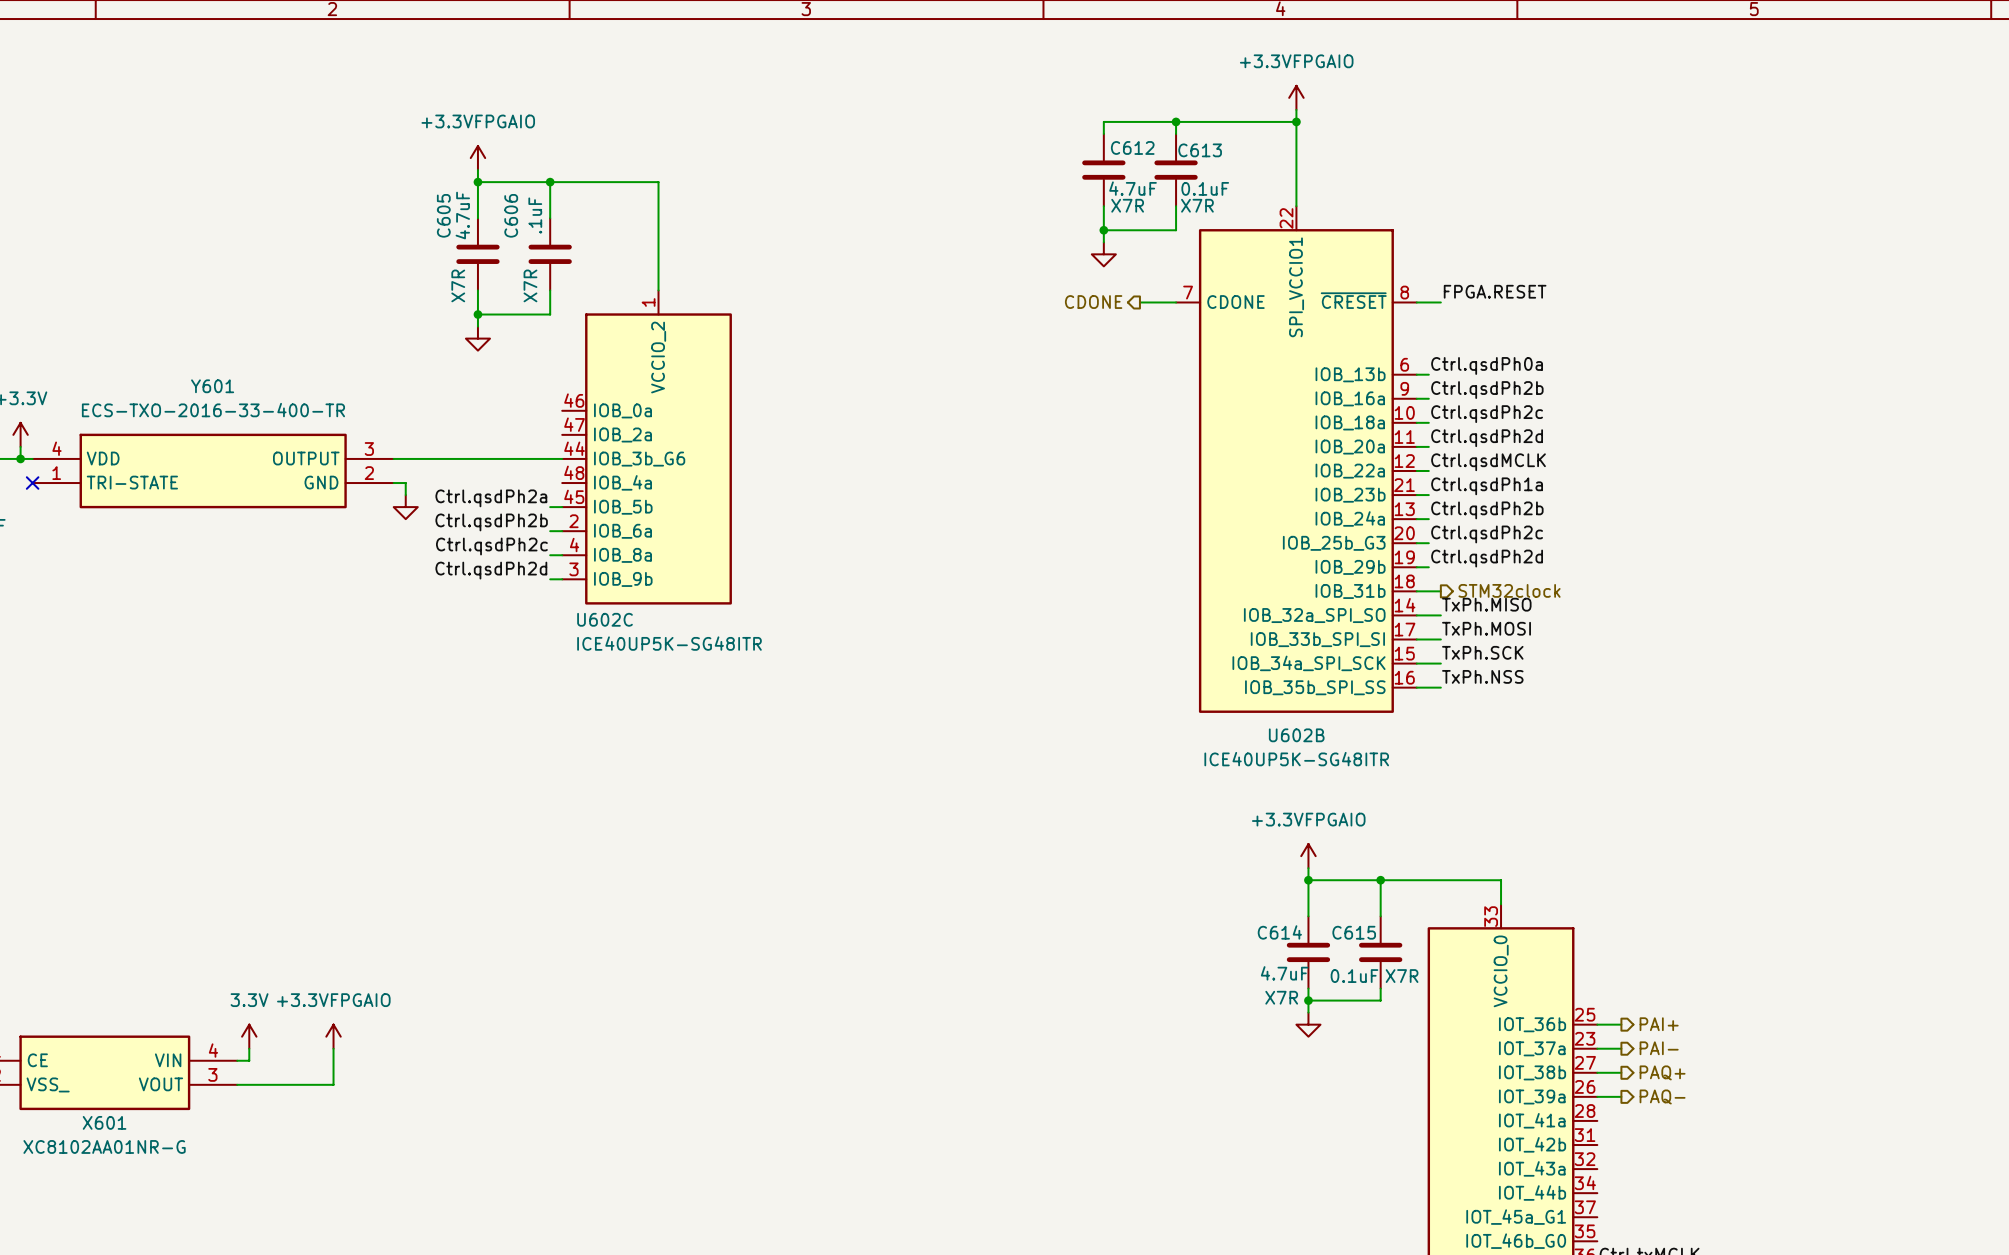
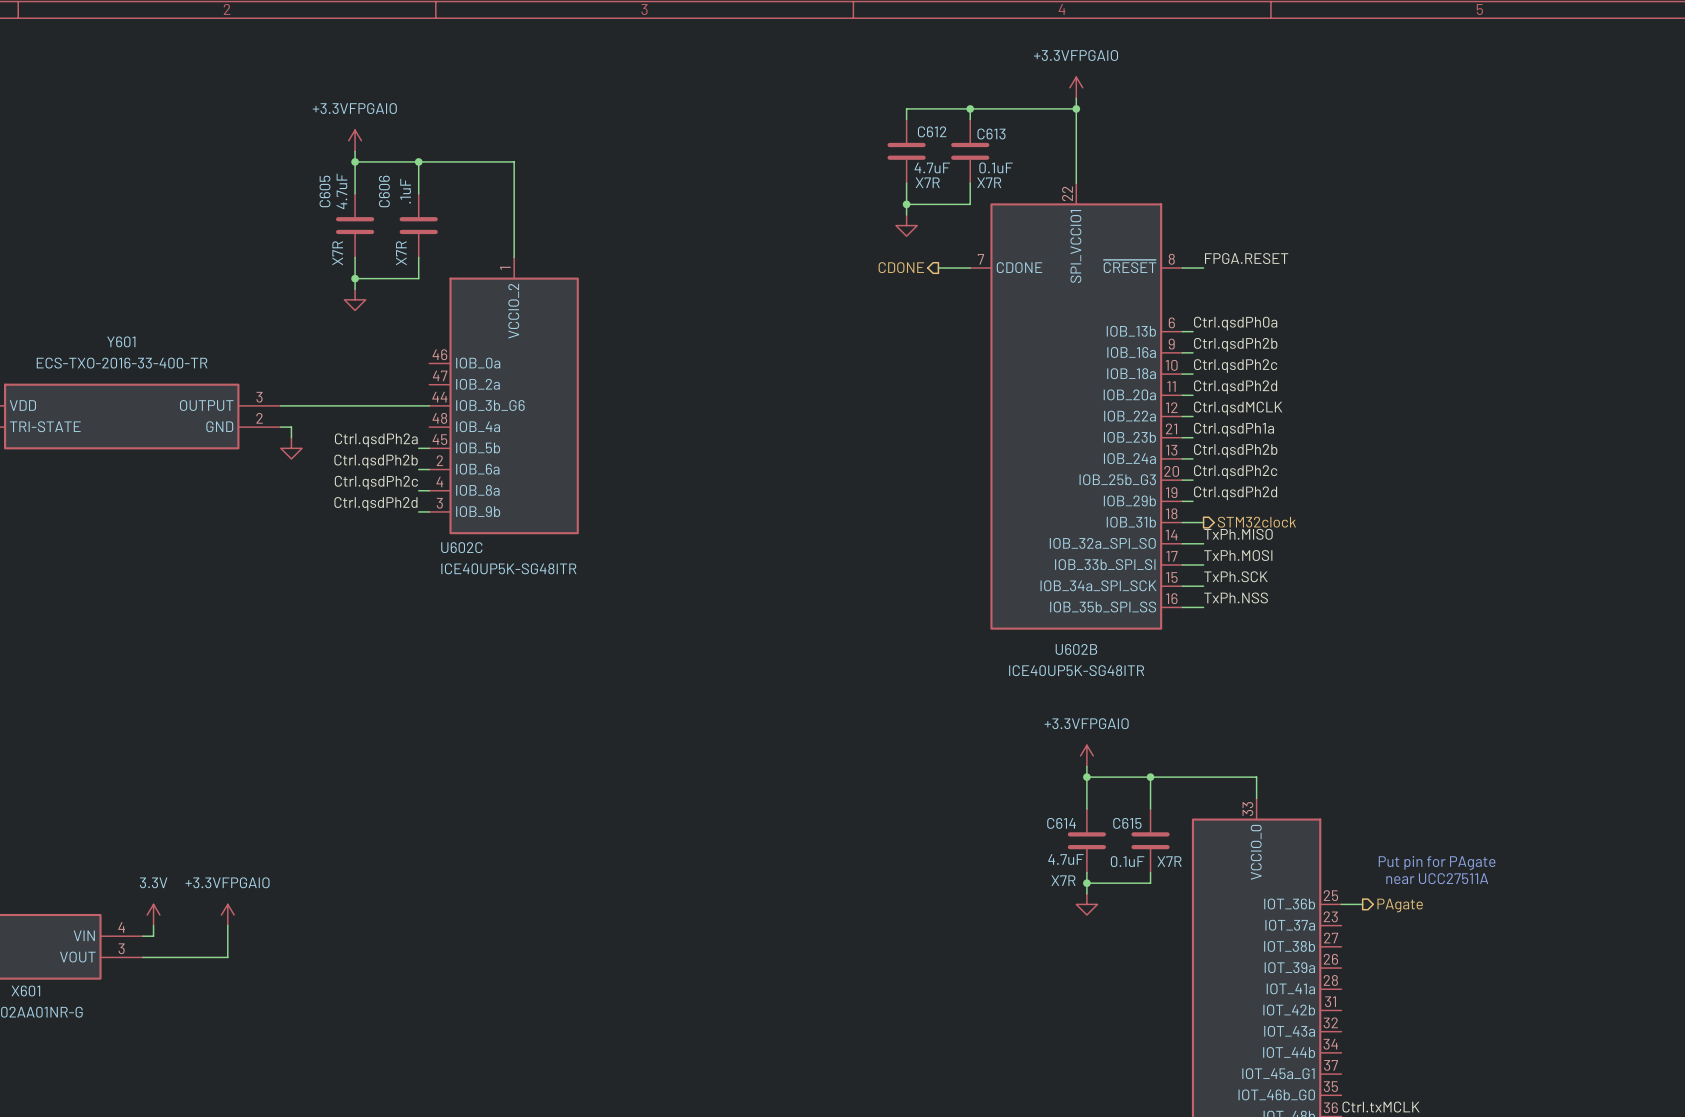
text: none -> Put pin for PAgate (1437, 862)
text: none -> near UCC27511A (1437, 878)
hierarchical label: PAI+ (1659, 1024) -> PAgate (1400, 905)
wire: (1597, 1048) (1621, 1048) -> none
hierarchical label: PAI- (1659, 1048) -> none
wire: (1597, 1072) (1621, 1072) -> none
hierarchical label: PAQ+ (1662, 1072) -> none
wire: (1597, 1096) (1621, 1096) -> none
hierarchical label: PAQ- (1662, 1096) -> none

